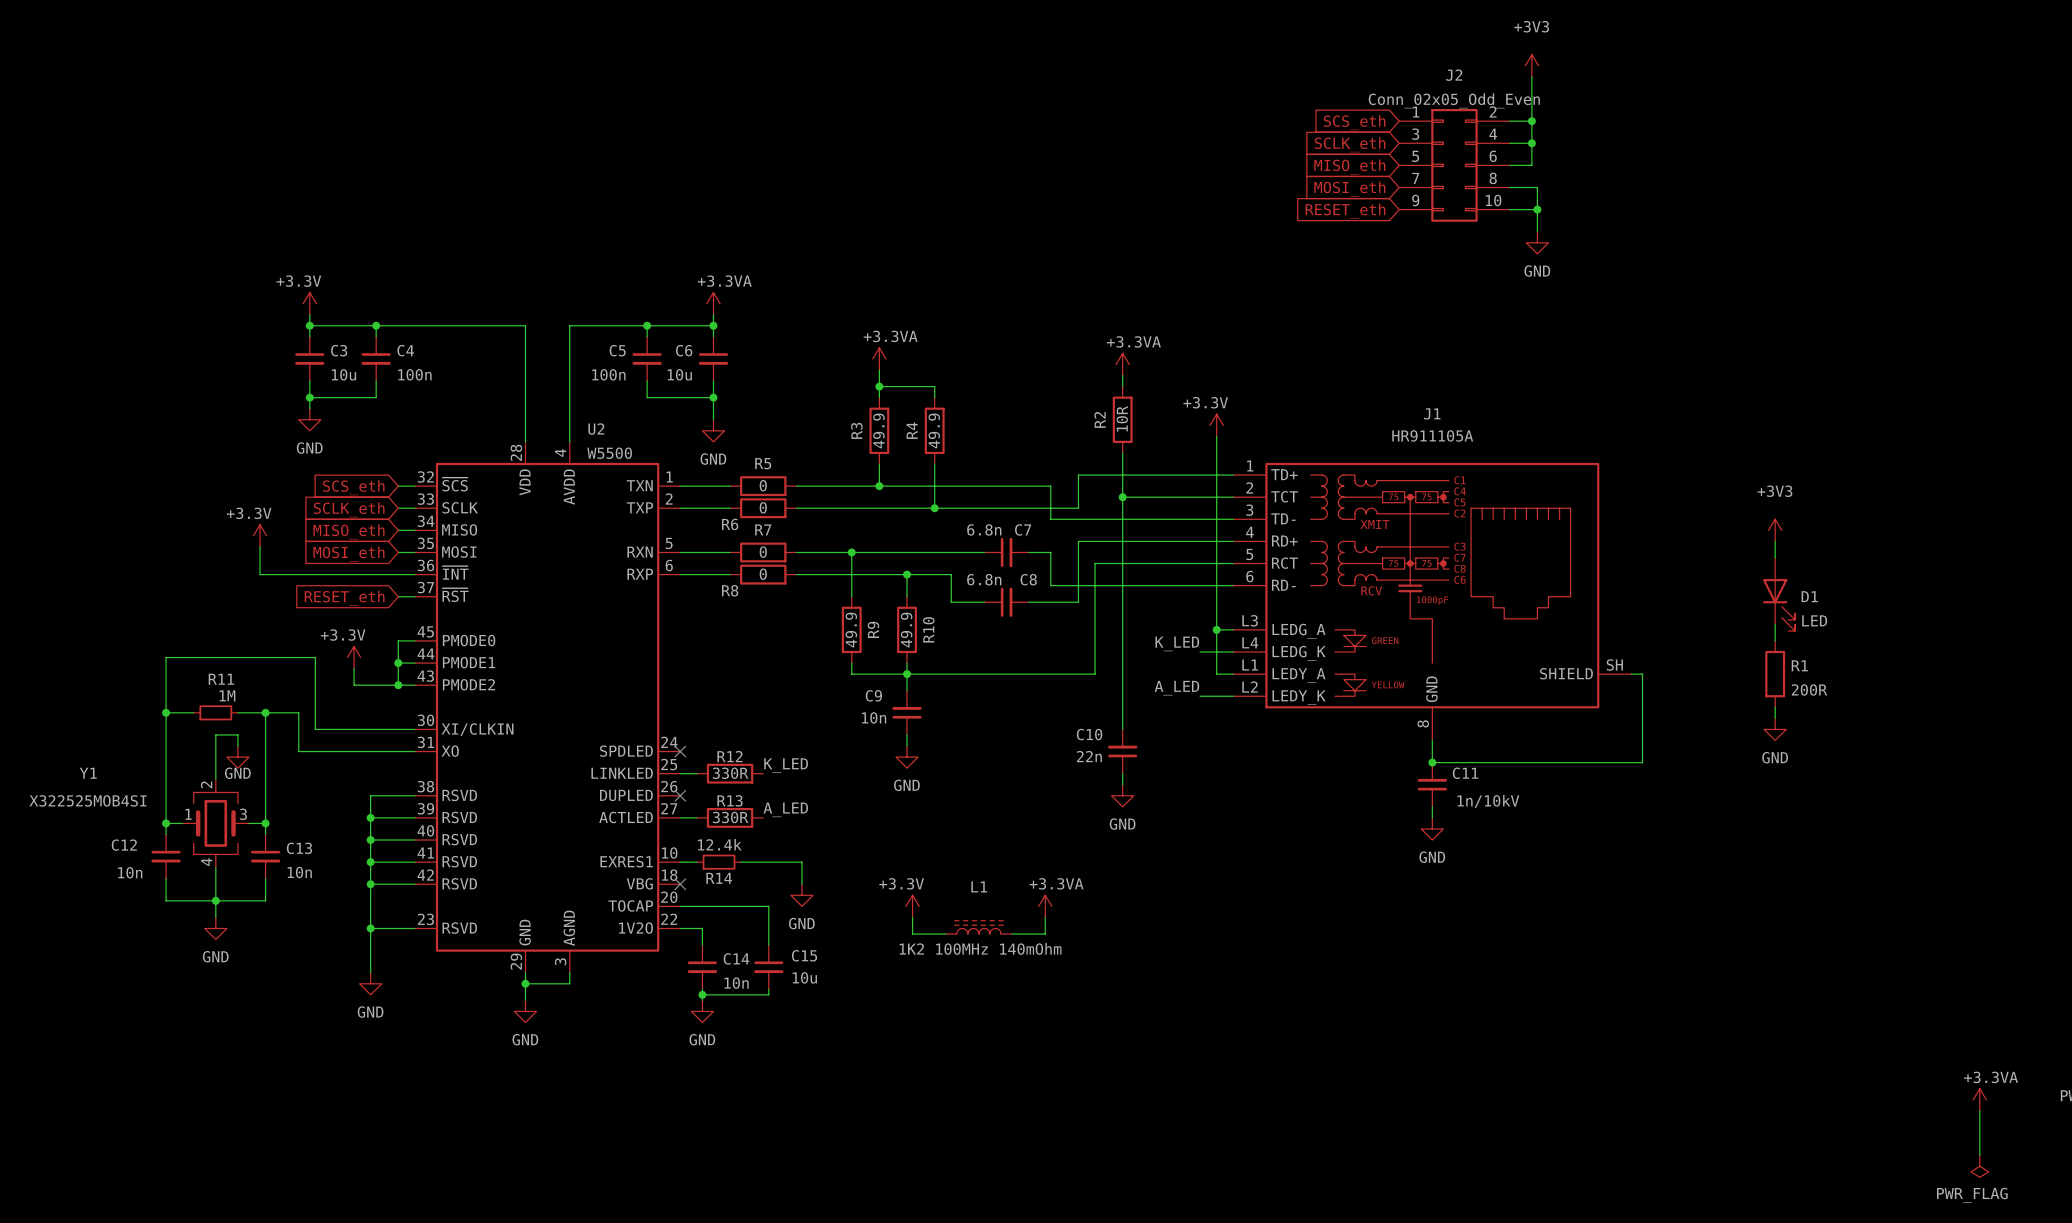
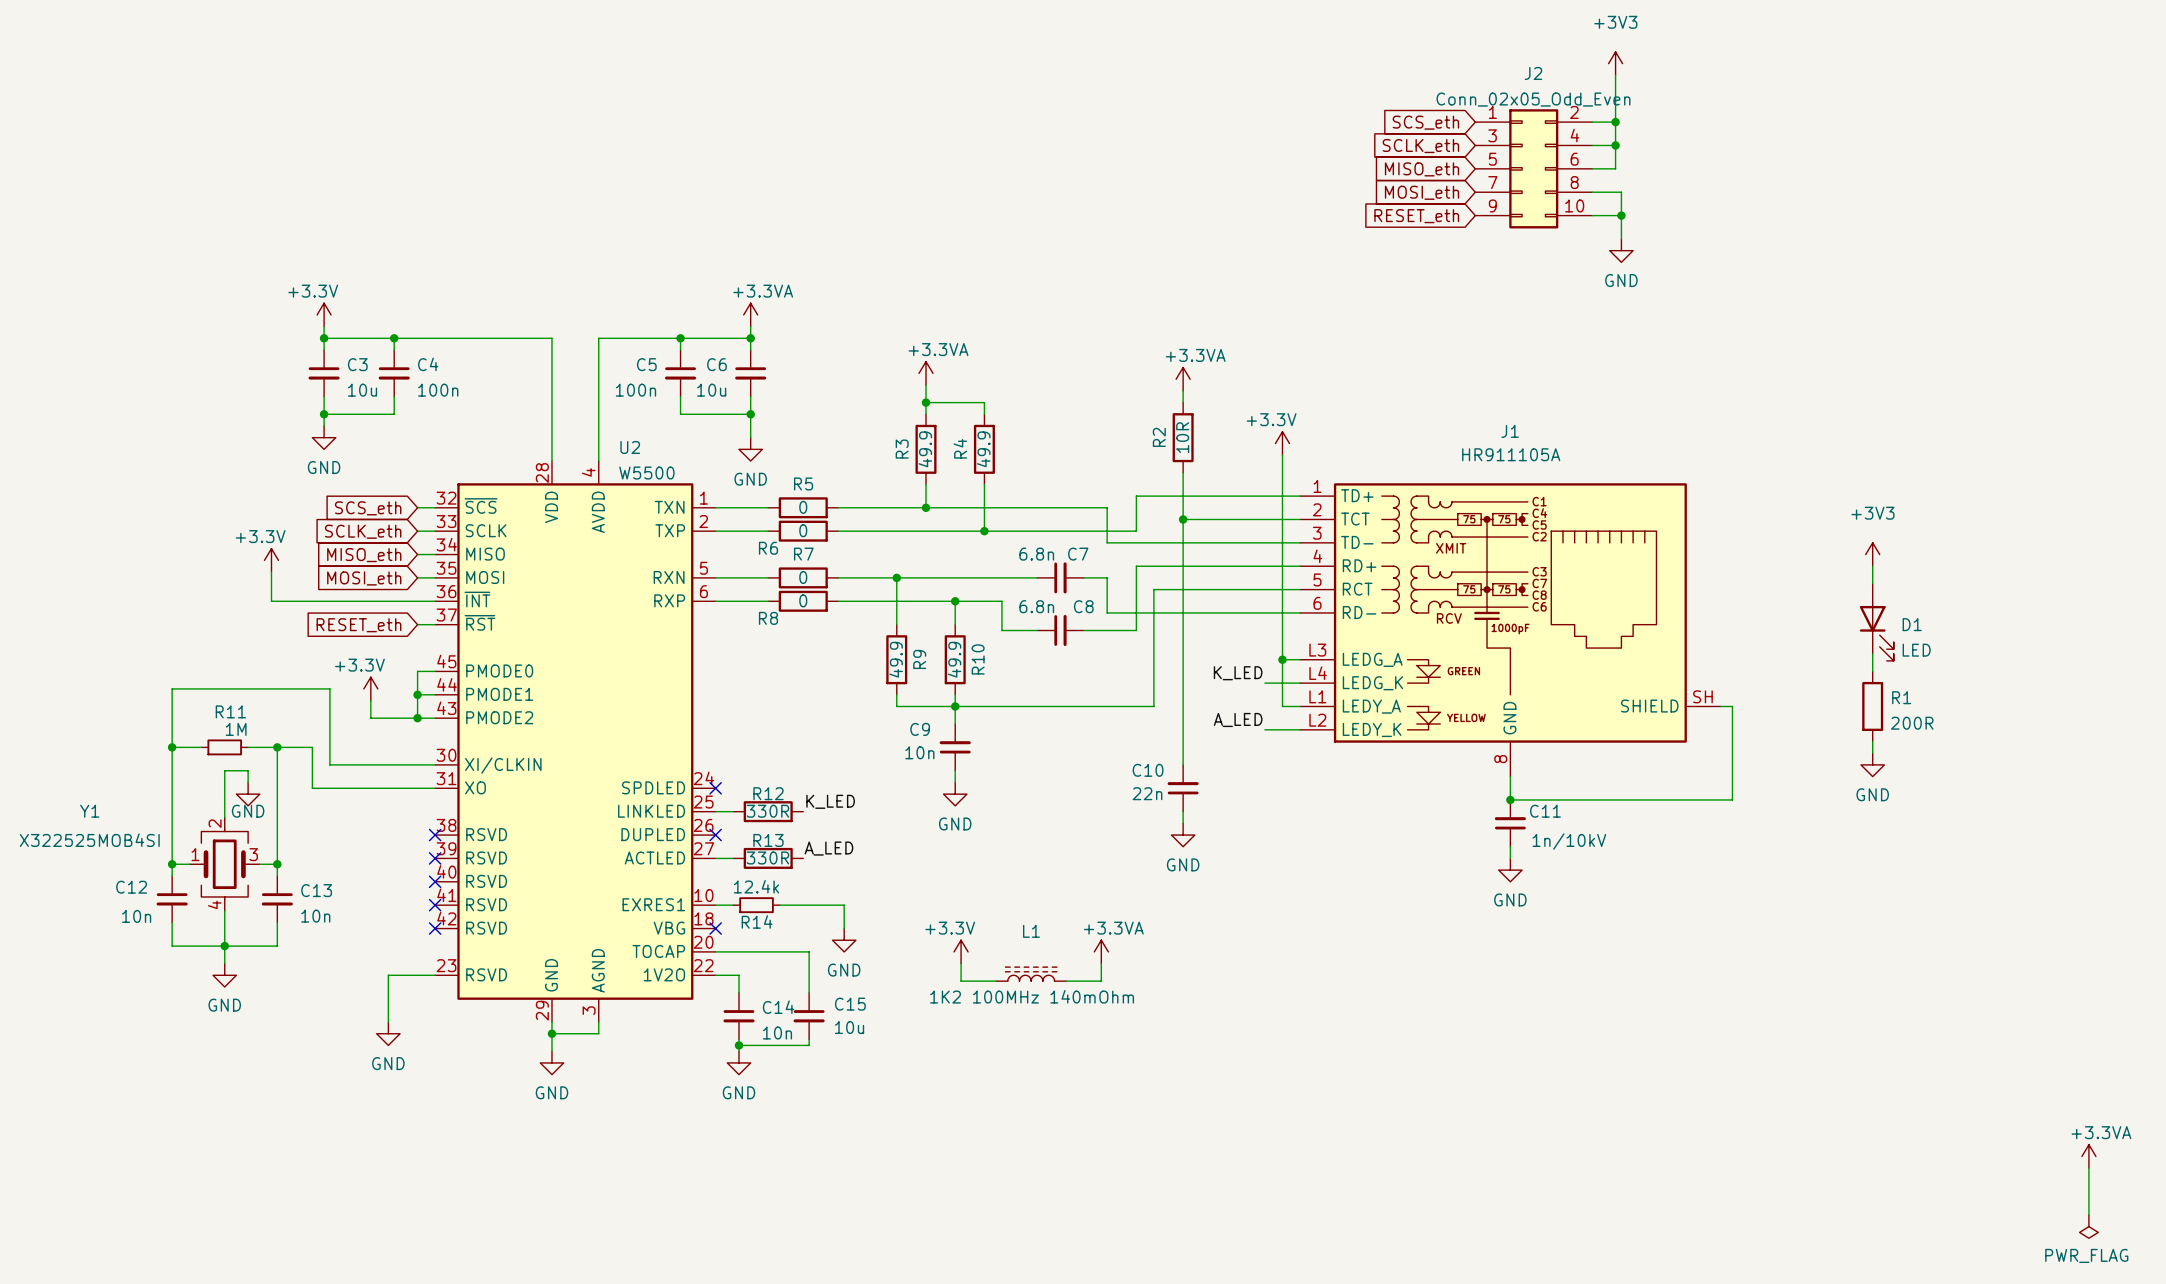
wire: (414, 795) (370, 795) (370, 928) -> none
no-connect mark: none -> (435, 835)
wire: (370, 817) (414, 817) -> none
junction: (370, 817) -> none
no-connect mark: none -> (435, 858)
wire: (370, 840) (414, 840) -> none
junction: (370, 840) -> none
no-connect mark: none -> (435, 881)
wire: (370, 862) (414, 862) -> none
junction: (370, 862) -> none
no-connect mark: none -> (435, 905)
wire: (370, 884) (414, 884) -> none
junction: (370, 884) -> none
no-connect mark: none -> (435, 928)
junction: (370, 928) -> none

